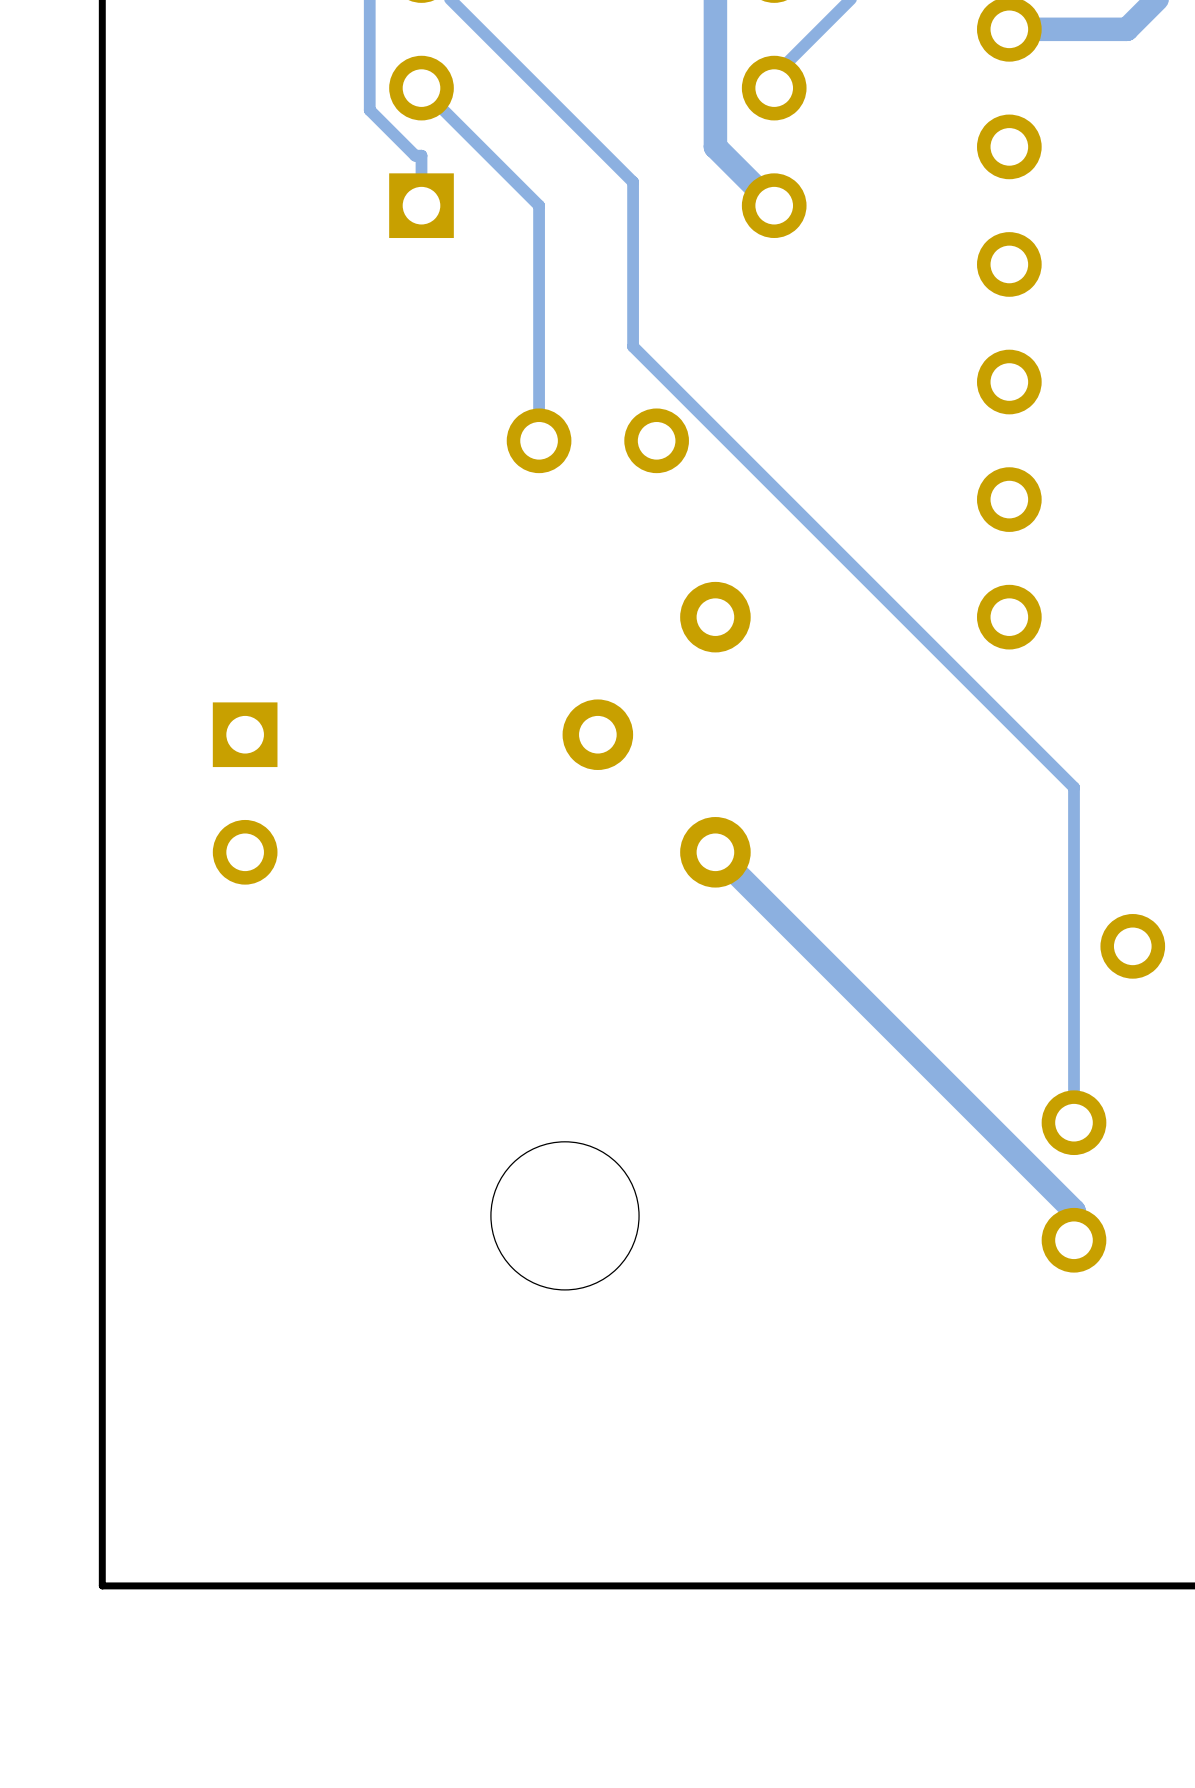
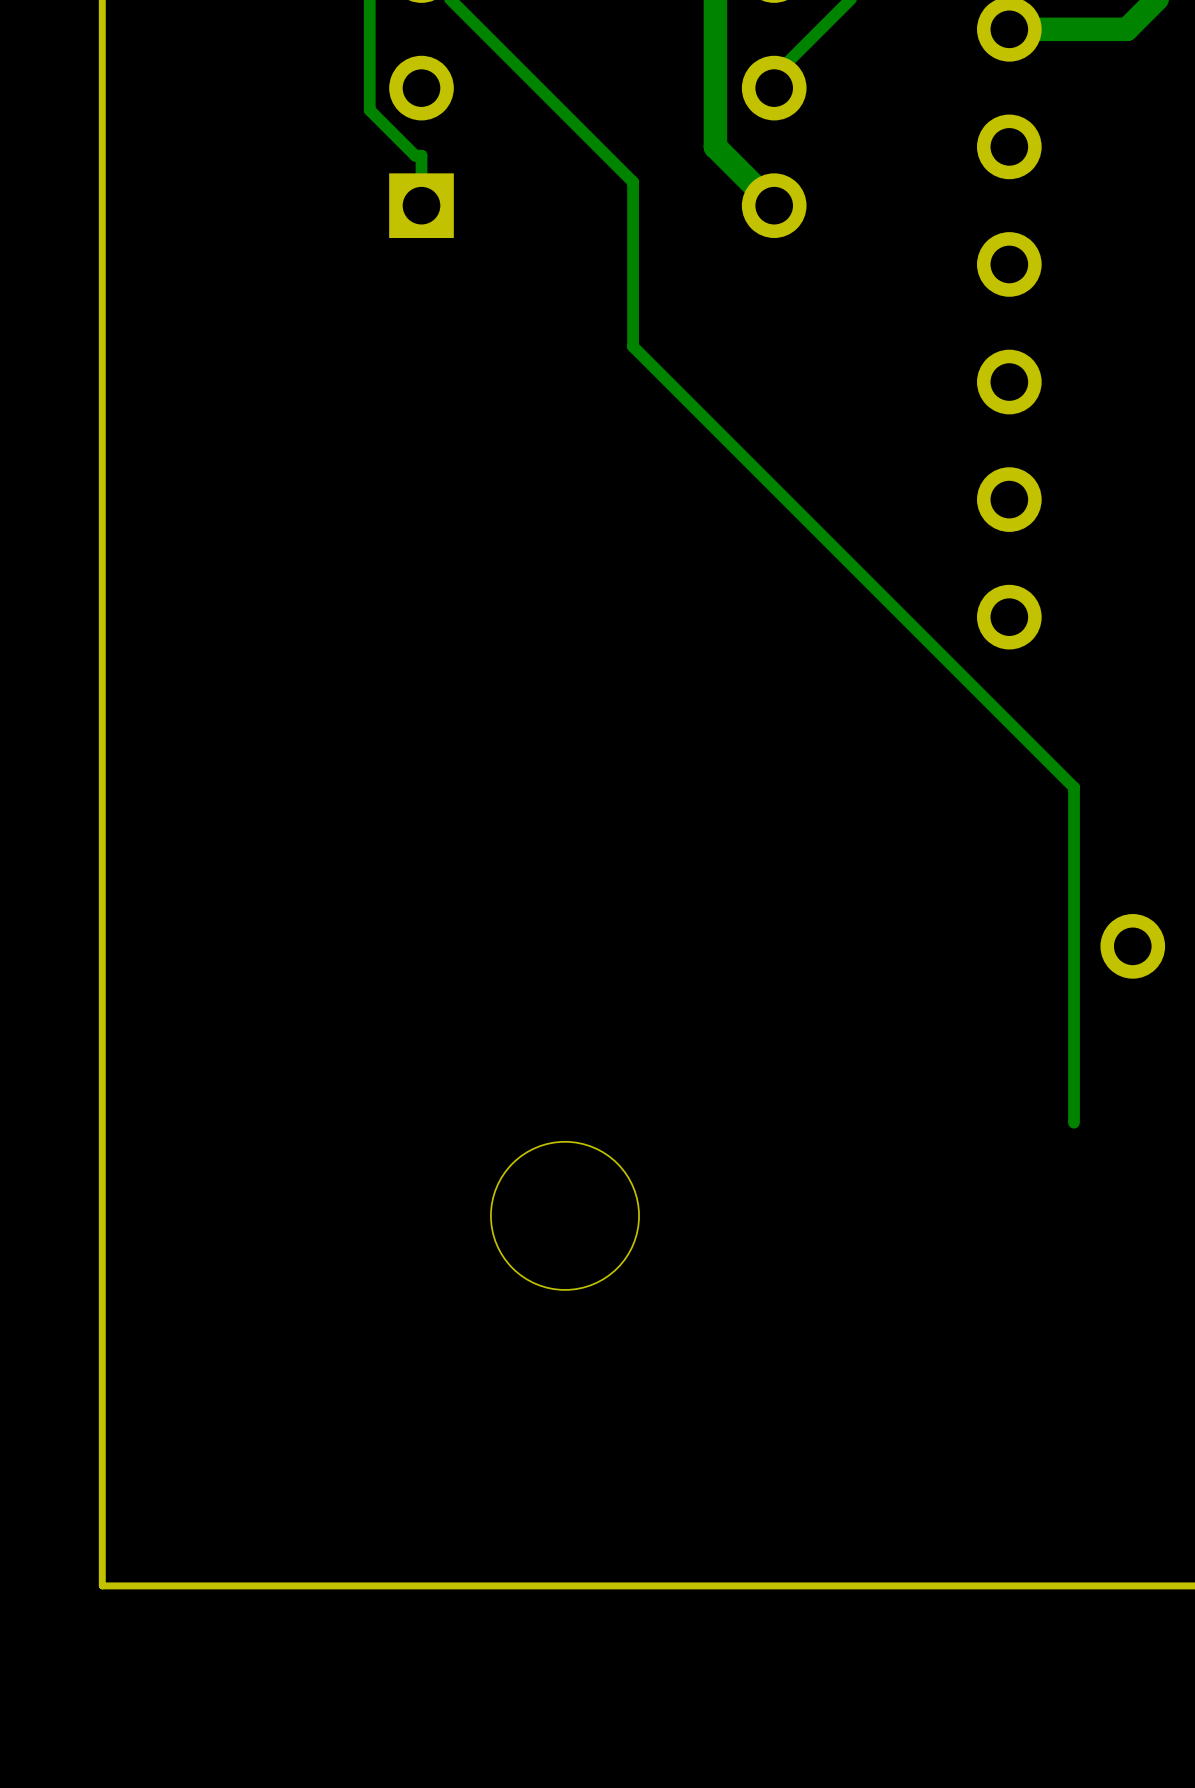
track: (421, 88) (539, 205) (539, 440) -> none
part: (597, 440) -> none
part: (656, 734) -> none
part: (245, 793) -> none
track: (715, 852) (1073, 1210) (1073, 1240) -> none
part: (1073, 1181) -> none

